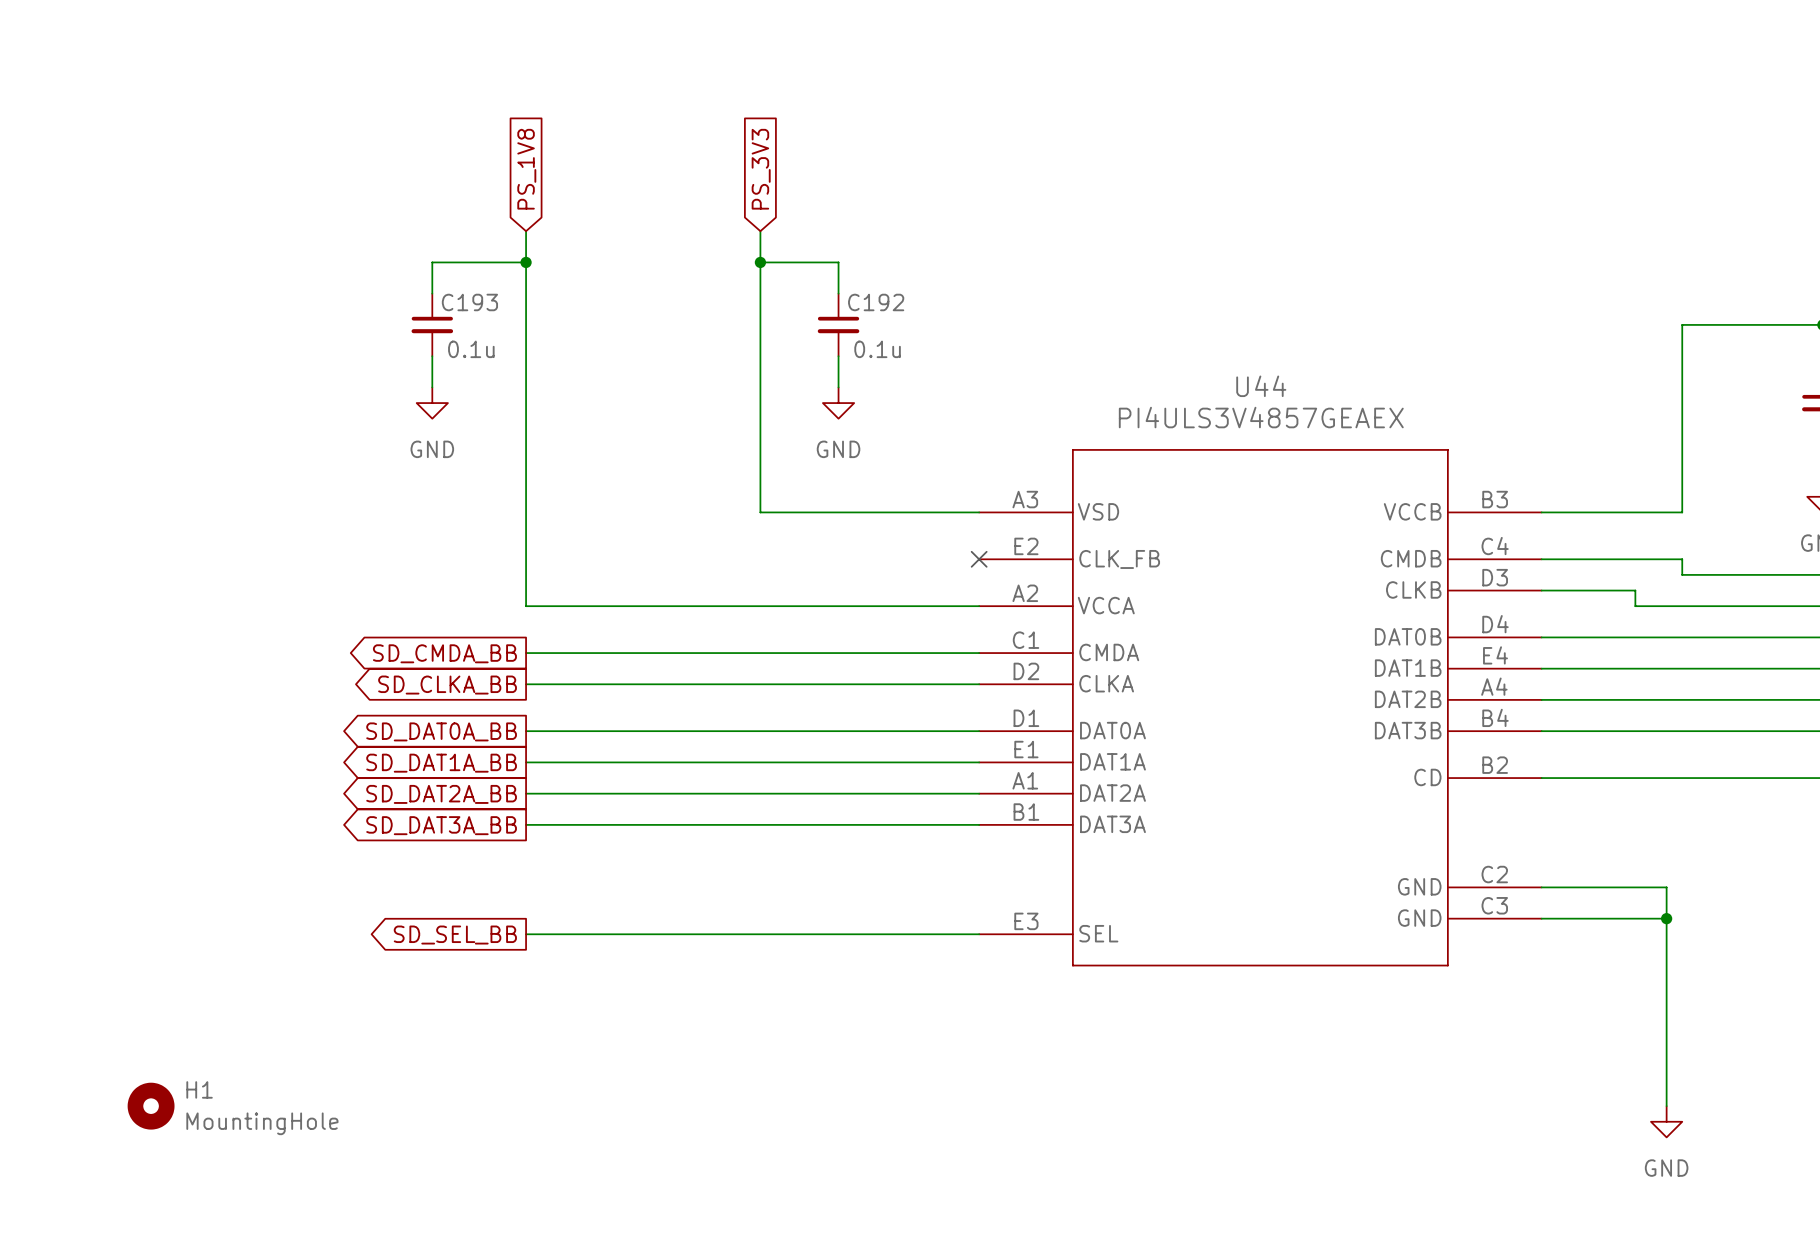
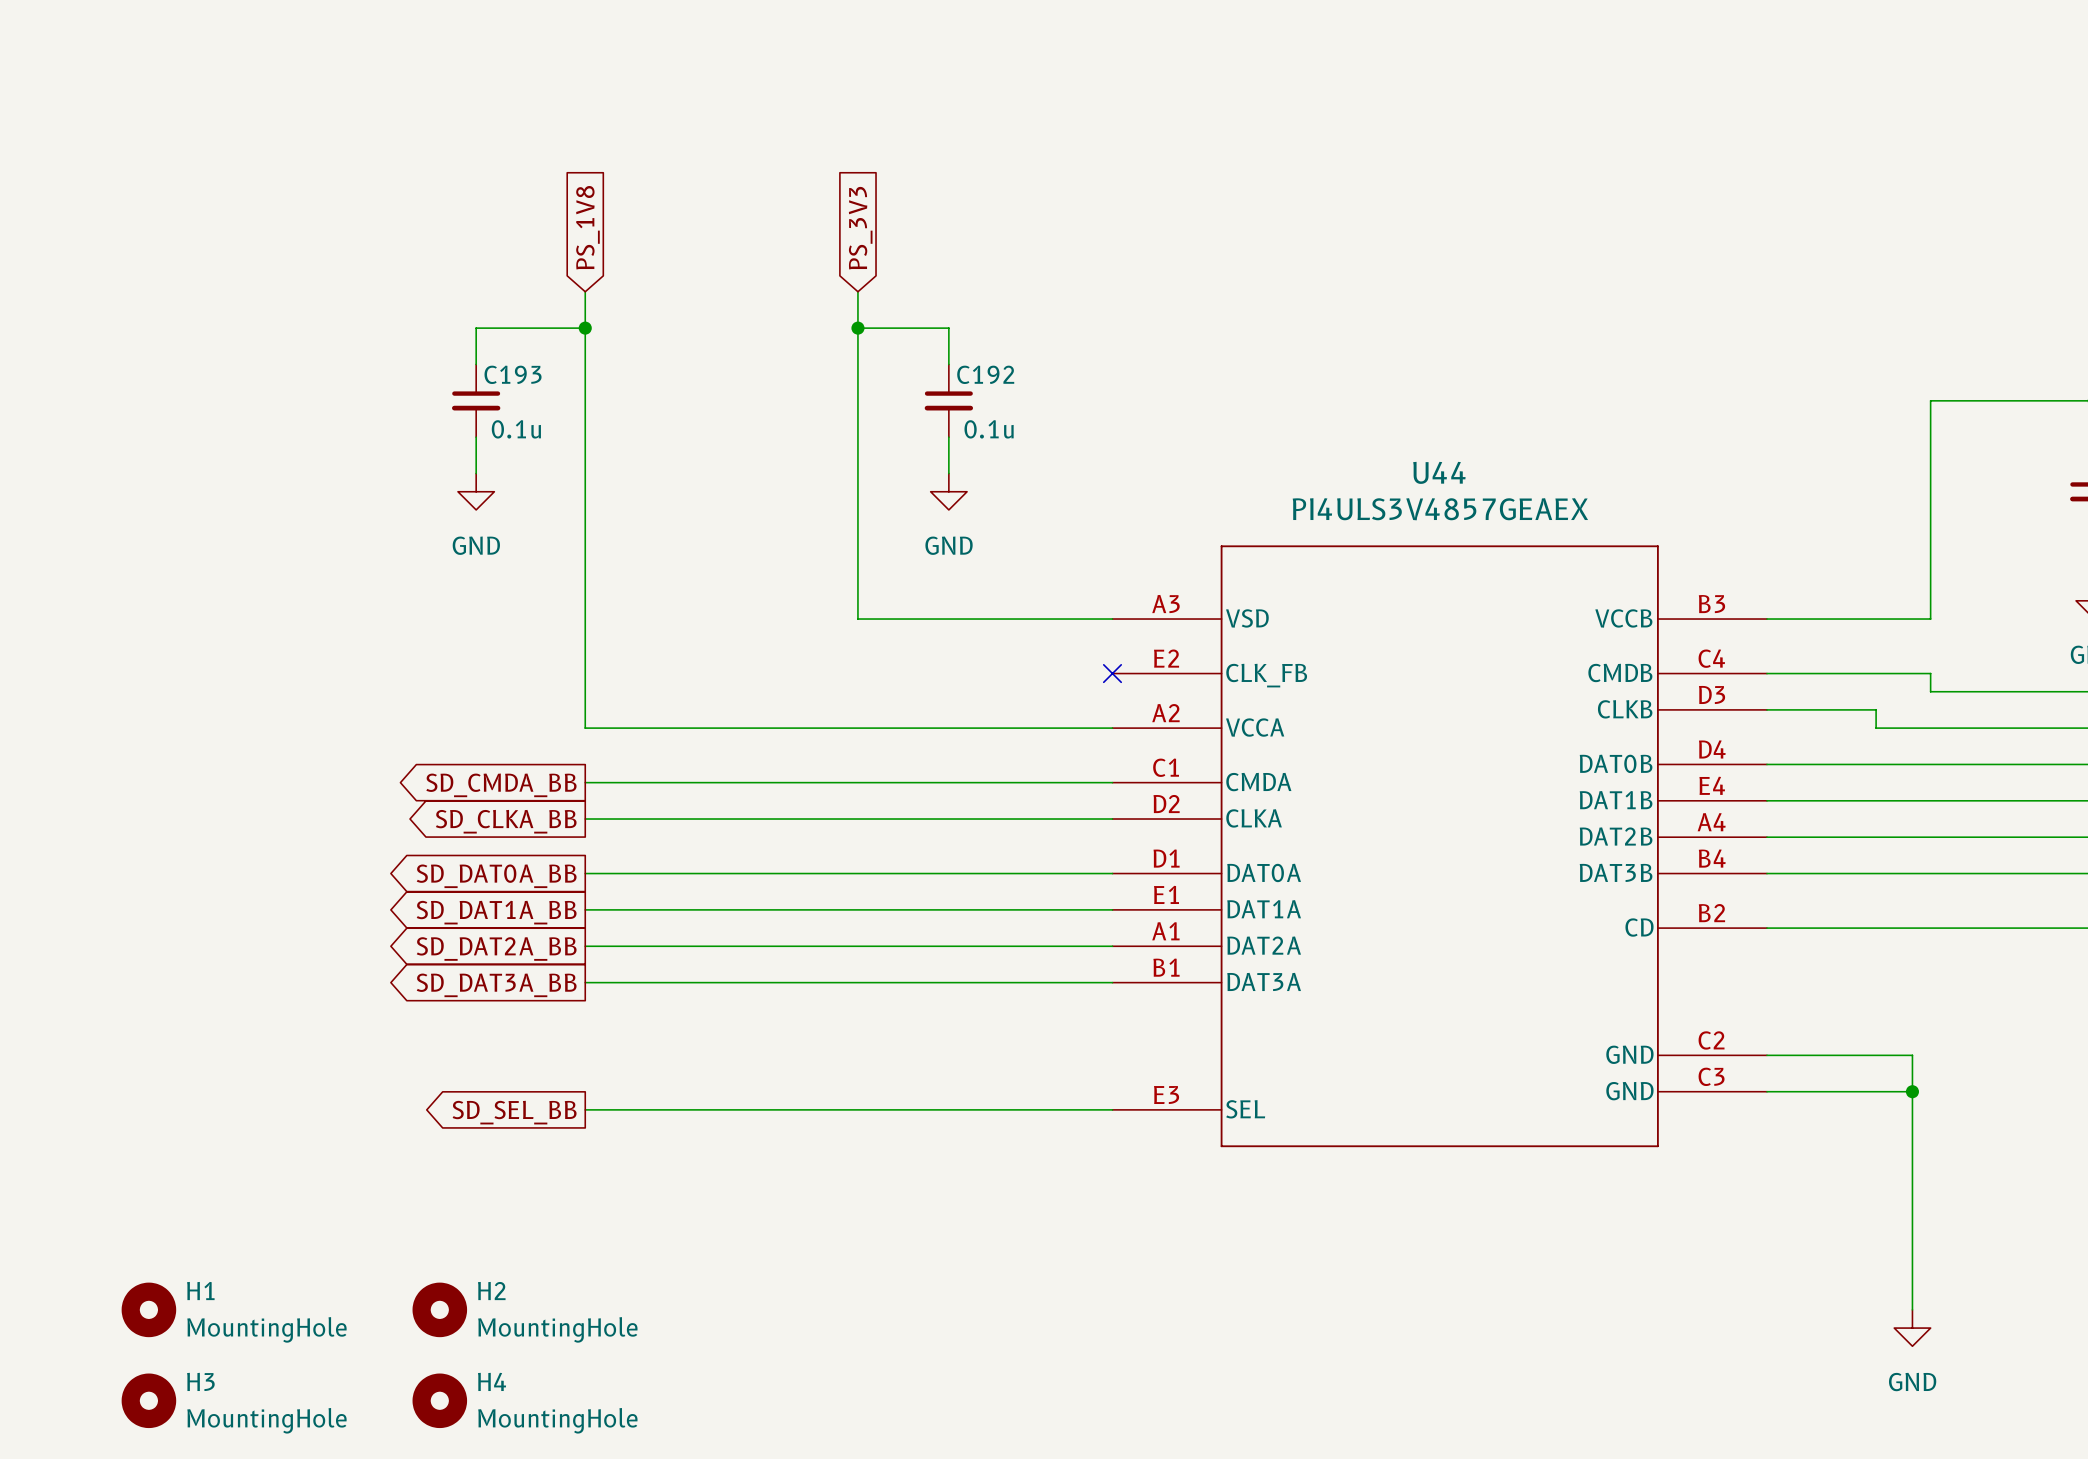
H2: none -> MountingHole (439, 1309)
H3: none -> MountingHole (148, 1400)
H4: none -> MountingHole (439, 1400)

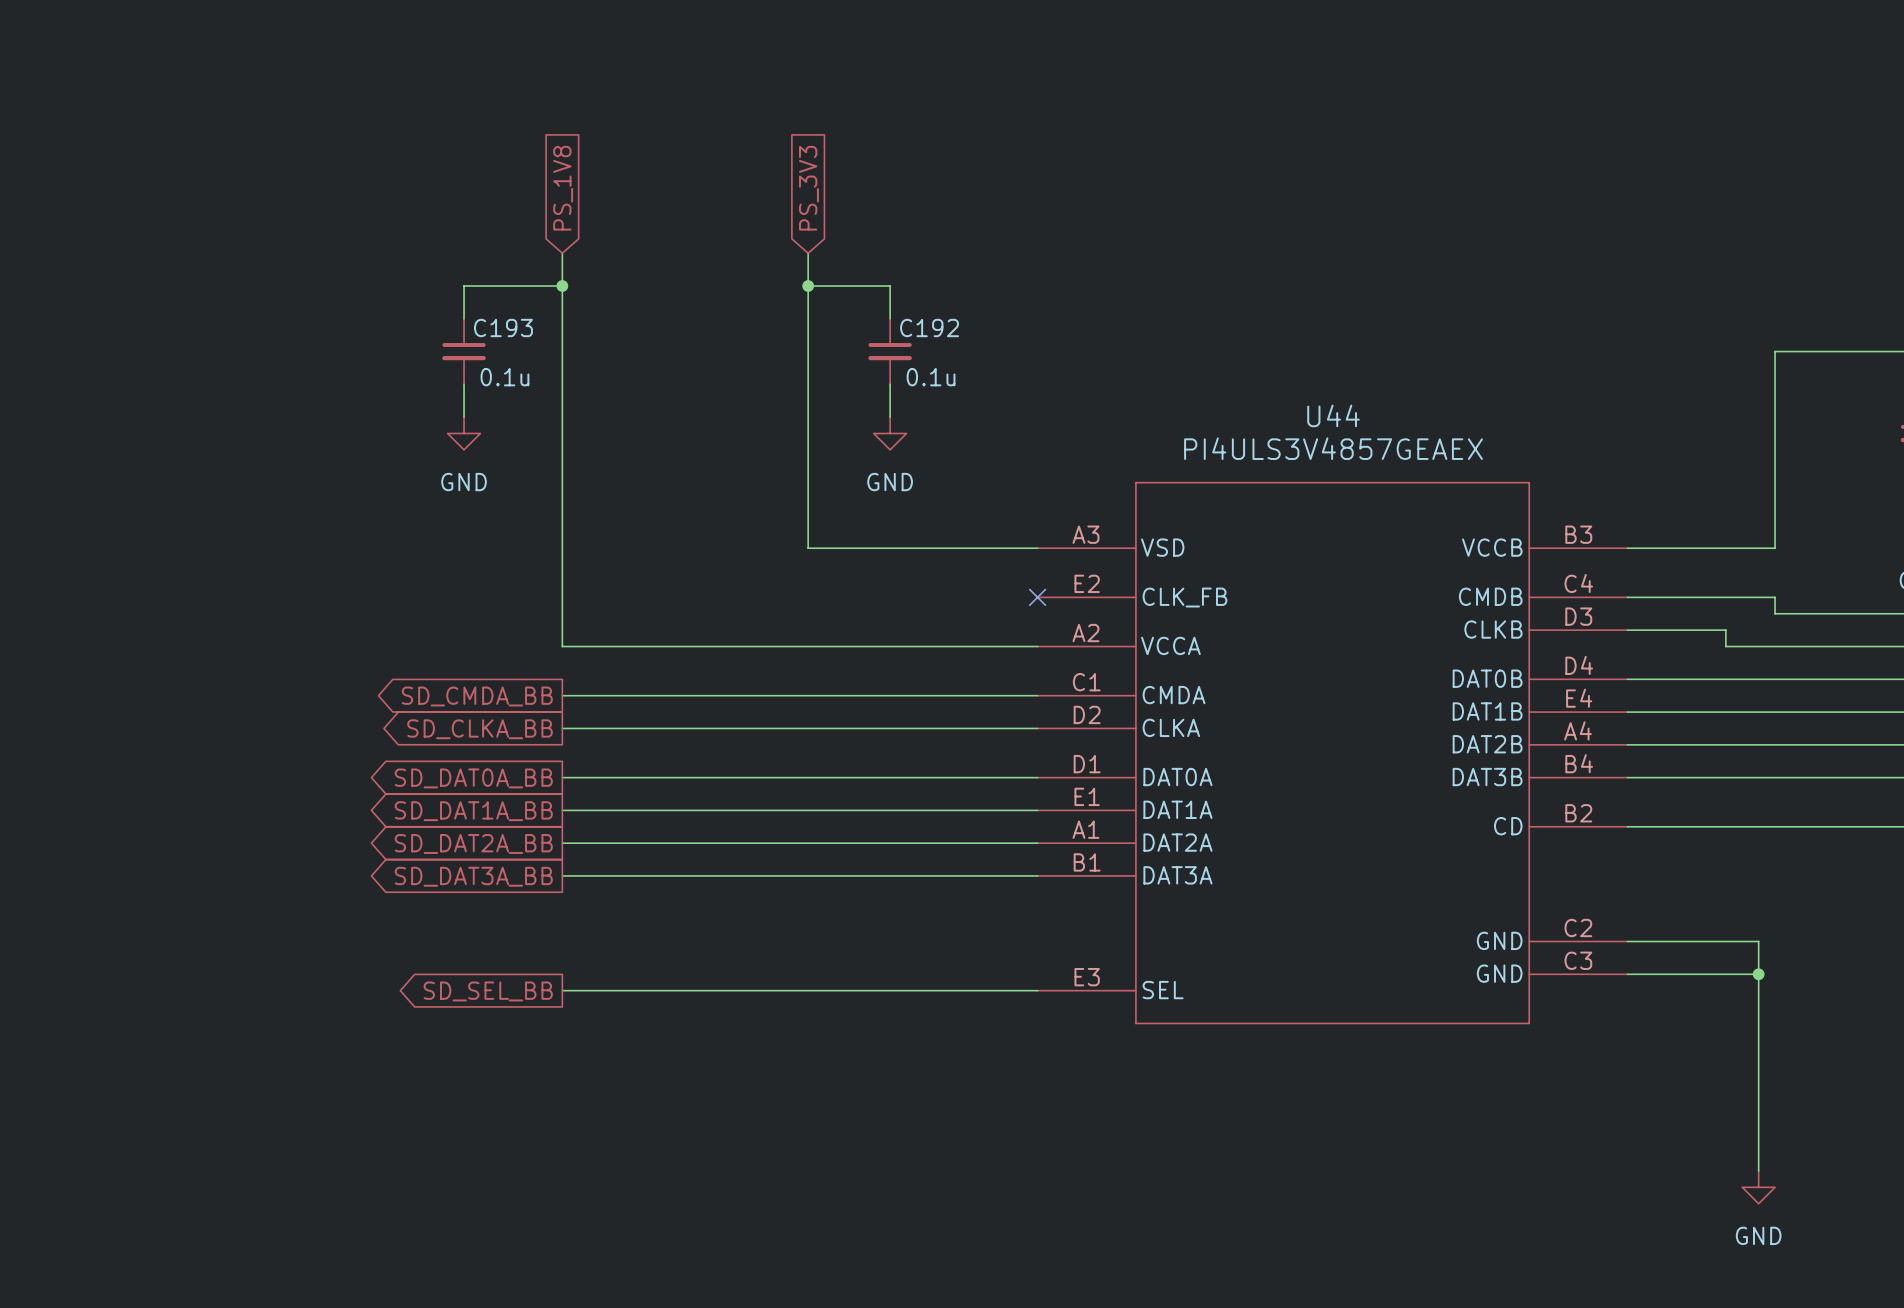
H1: MountingHole (148, 1309) -> none
H2: MountingHole (439, 1309) -> none
H3: MountingHole (148, 1400) -> none
H4: MountingHole (439, 1400) -> none

